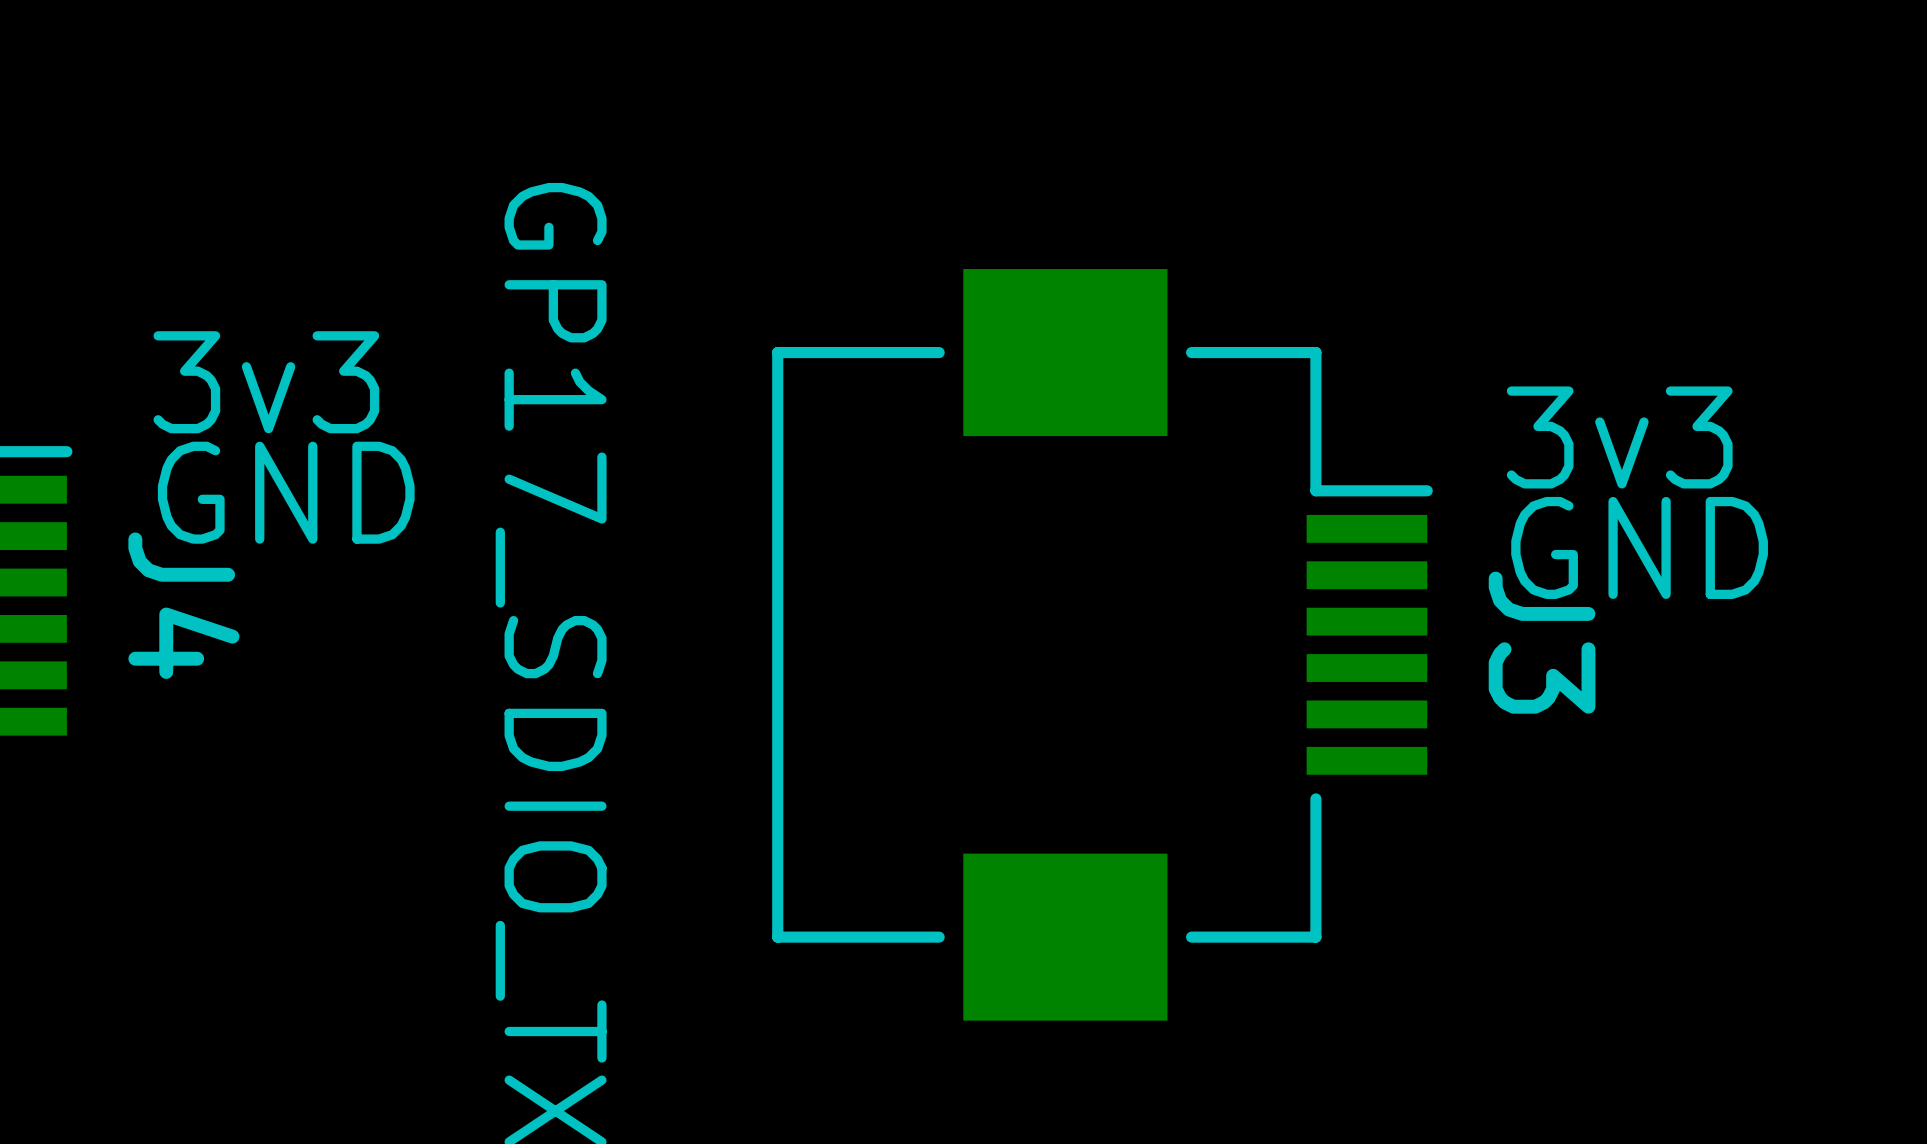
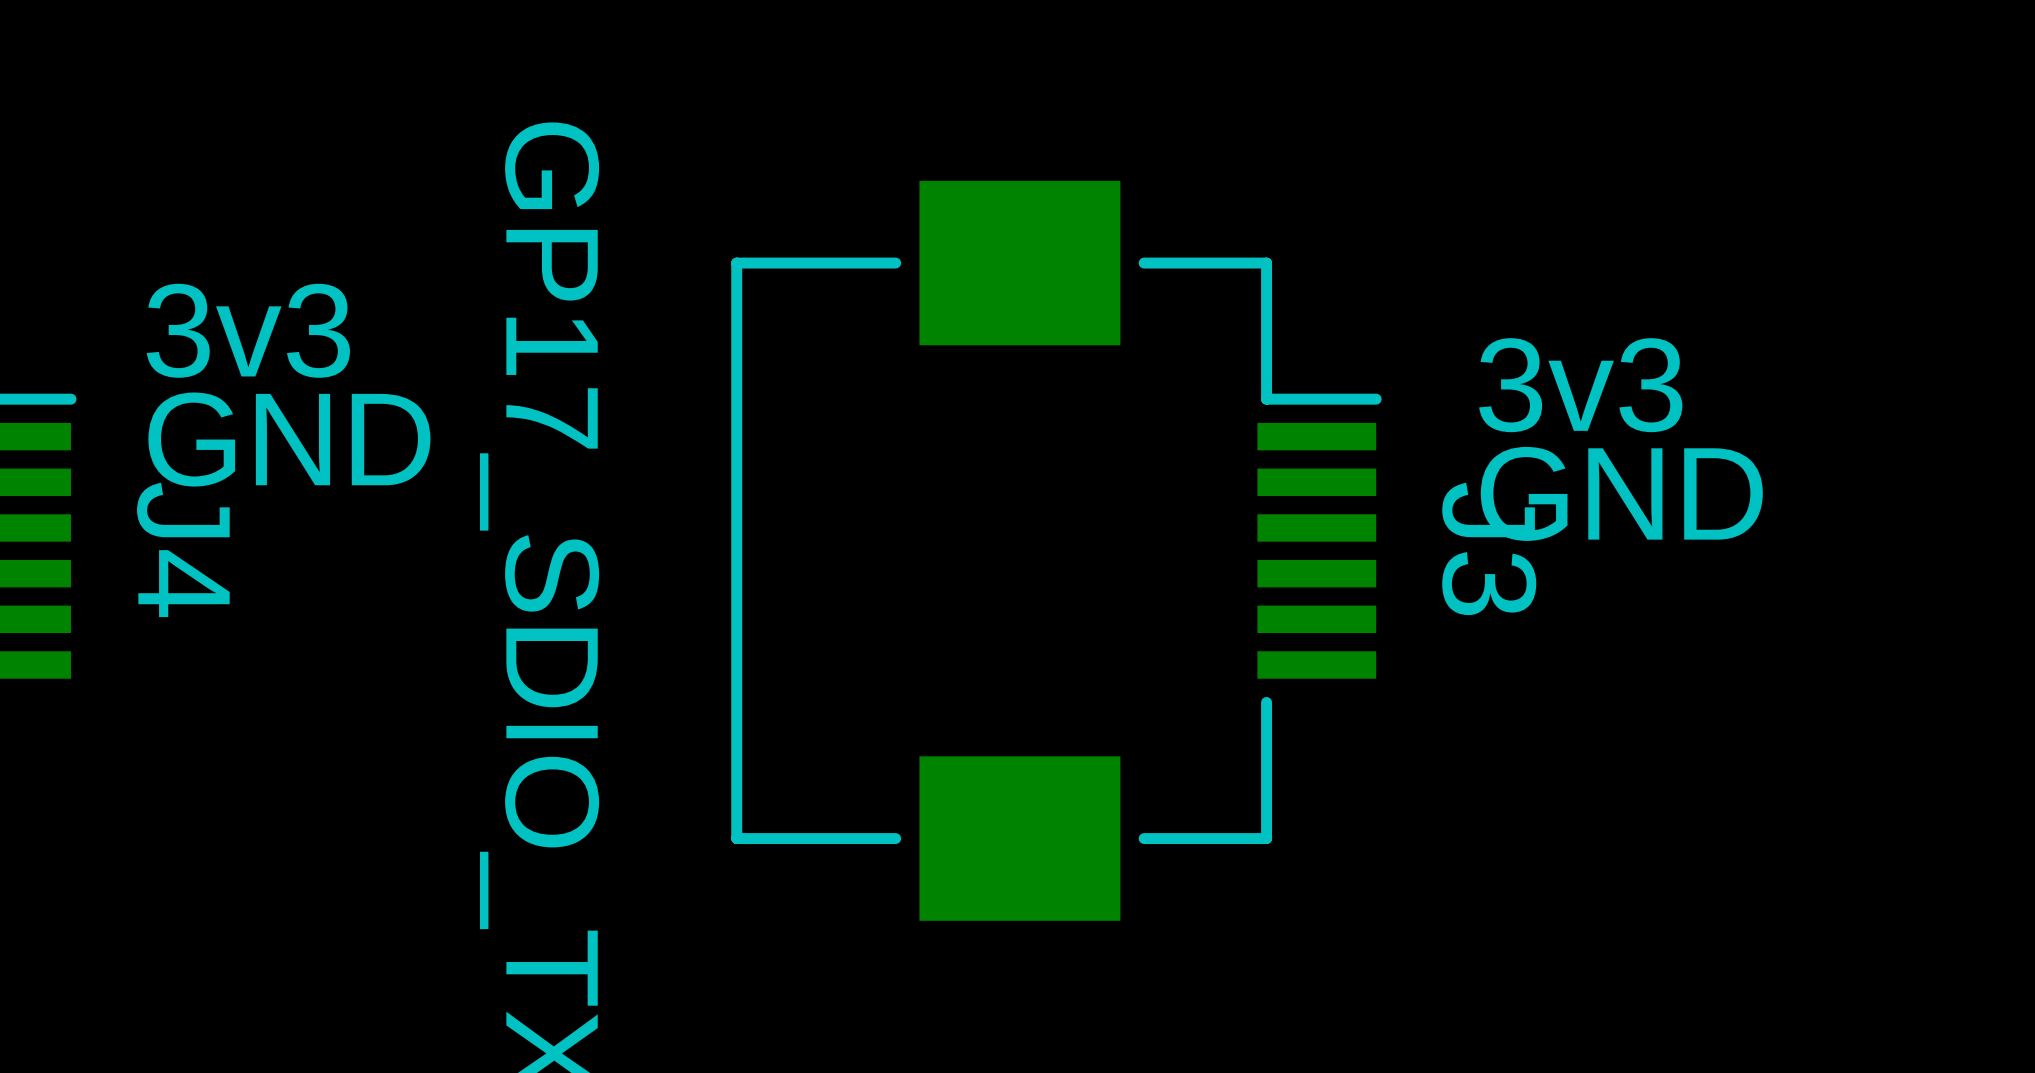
J3 position: (1102, 644) -> (1056, 550)

